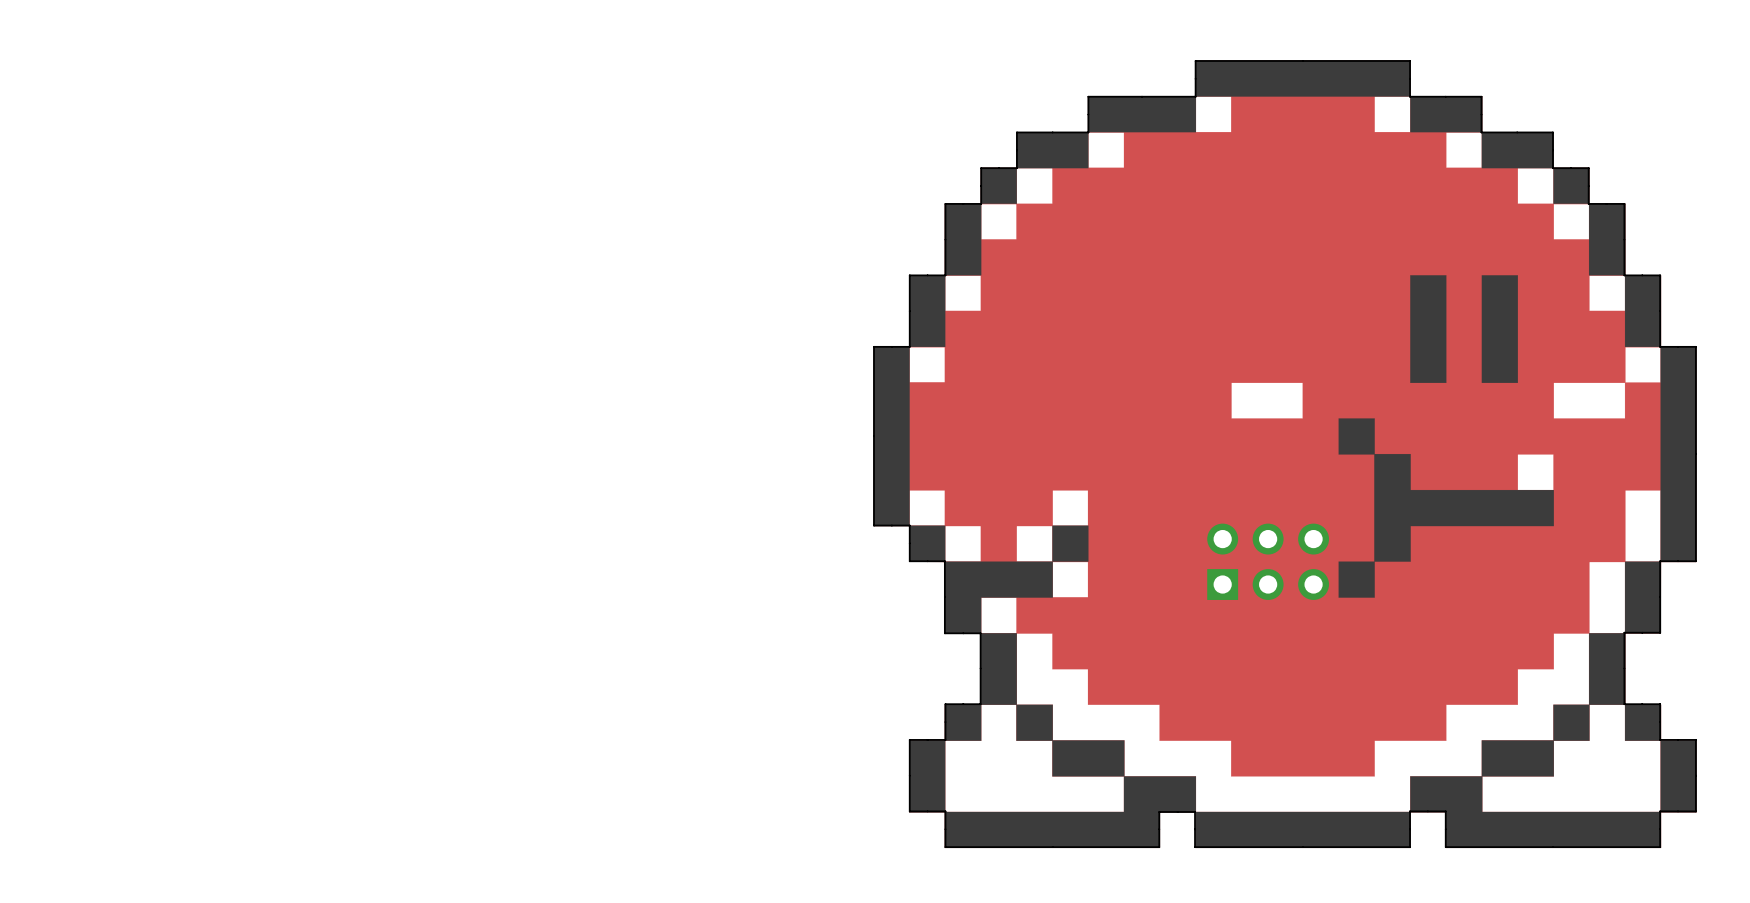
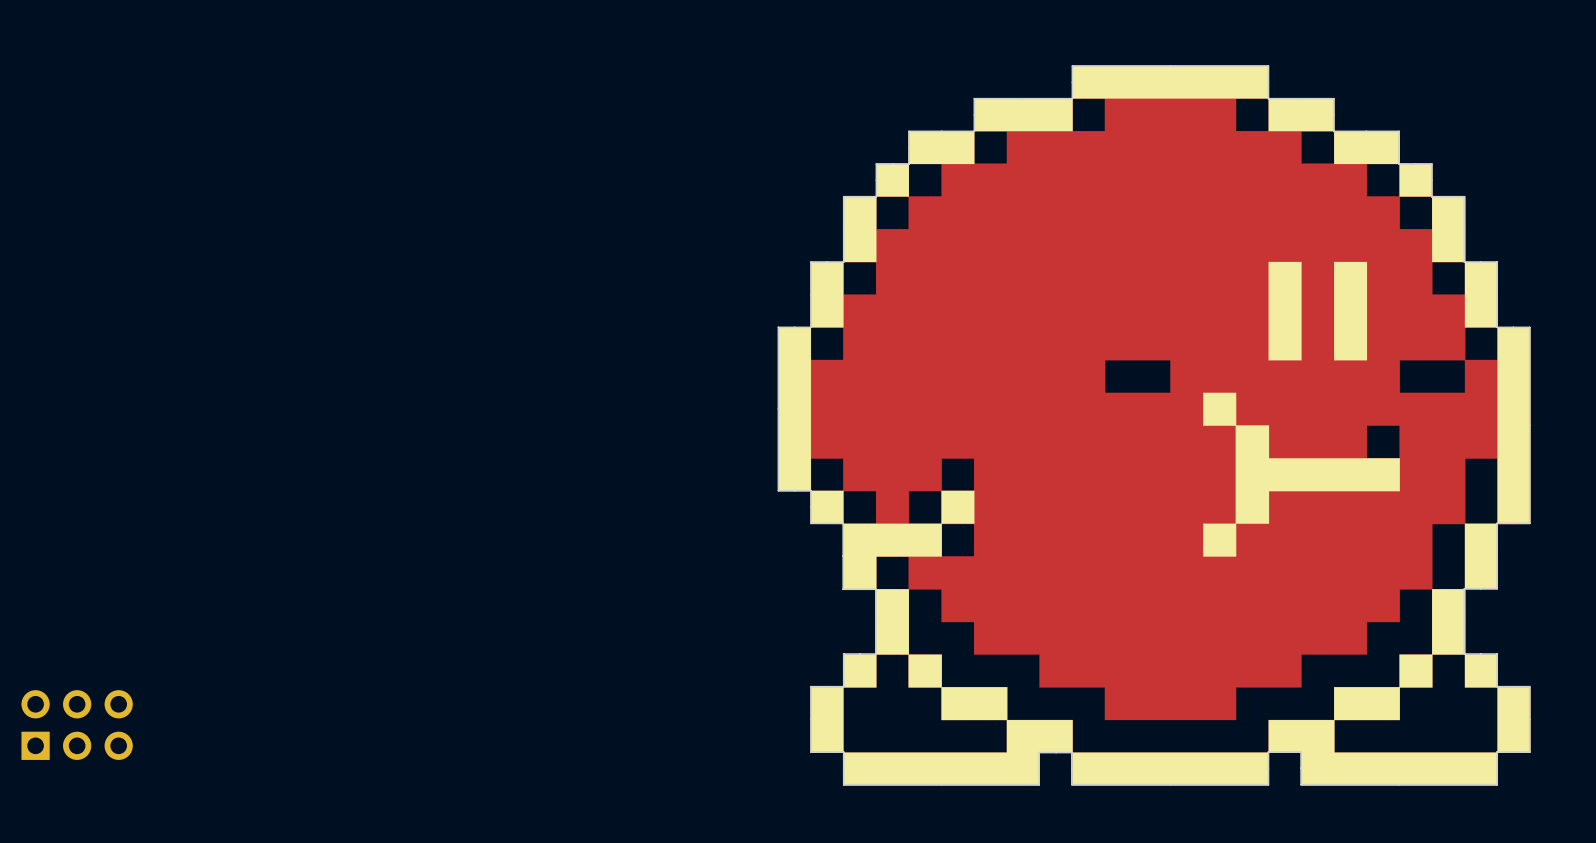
part: (1268, 561) -> none
part: none -> (77, 725)

